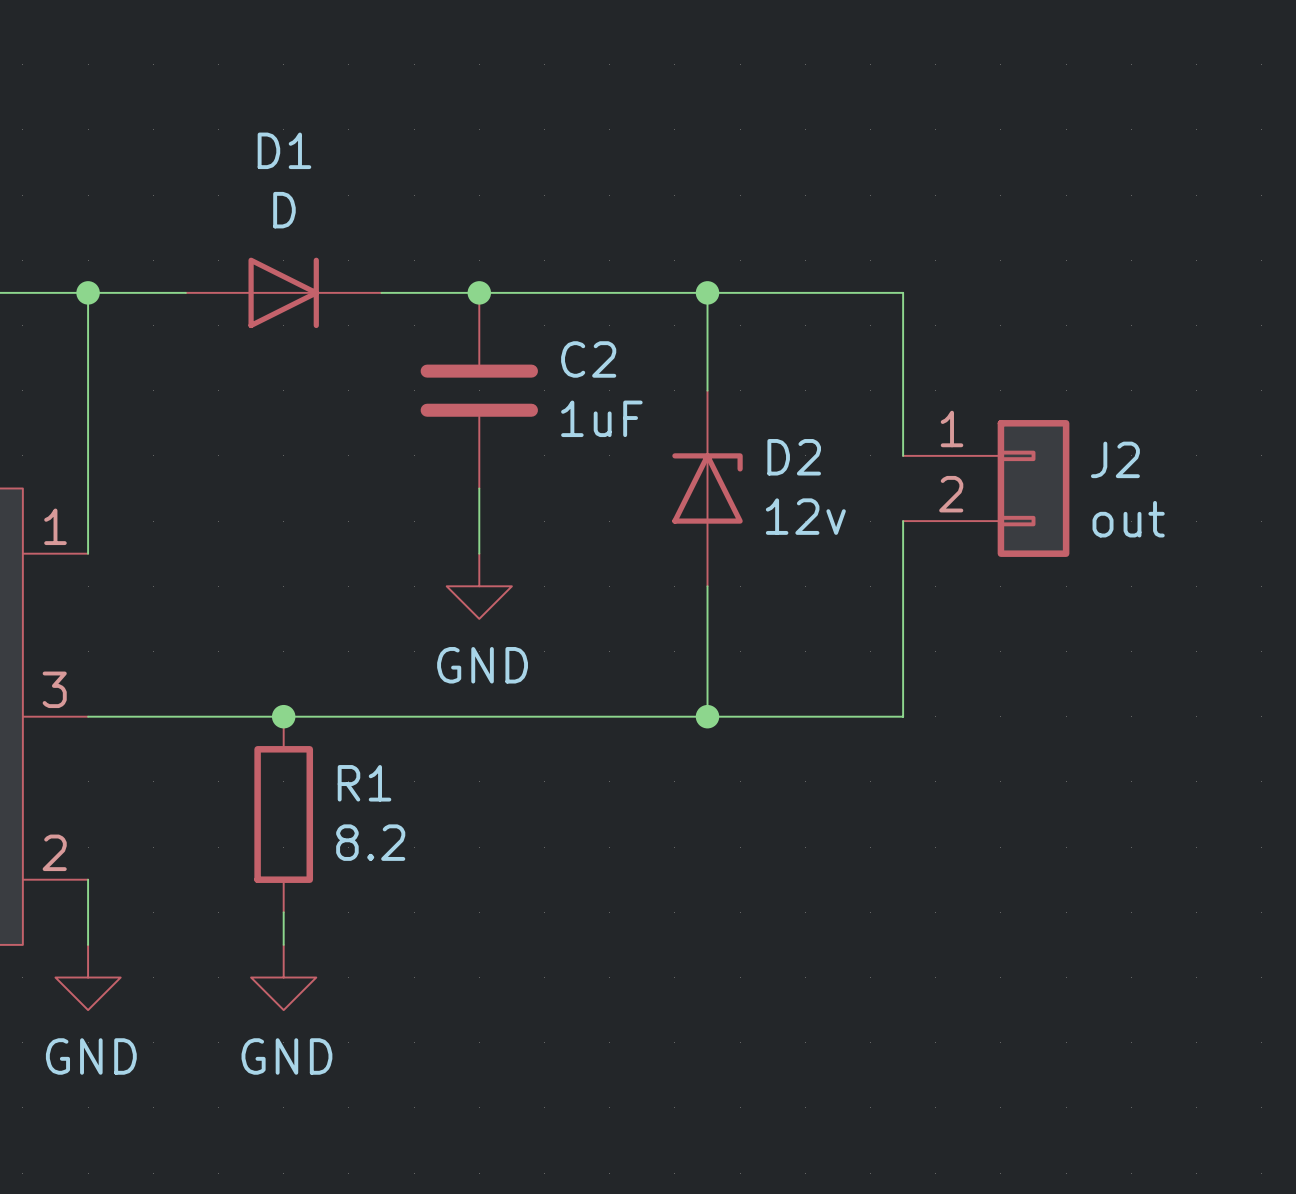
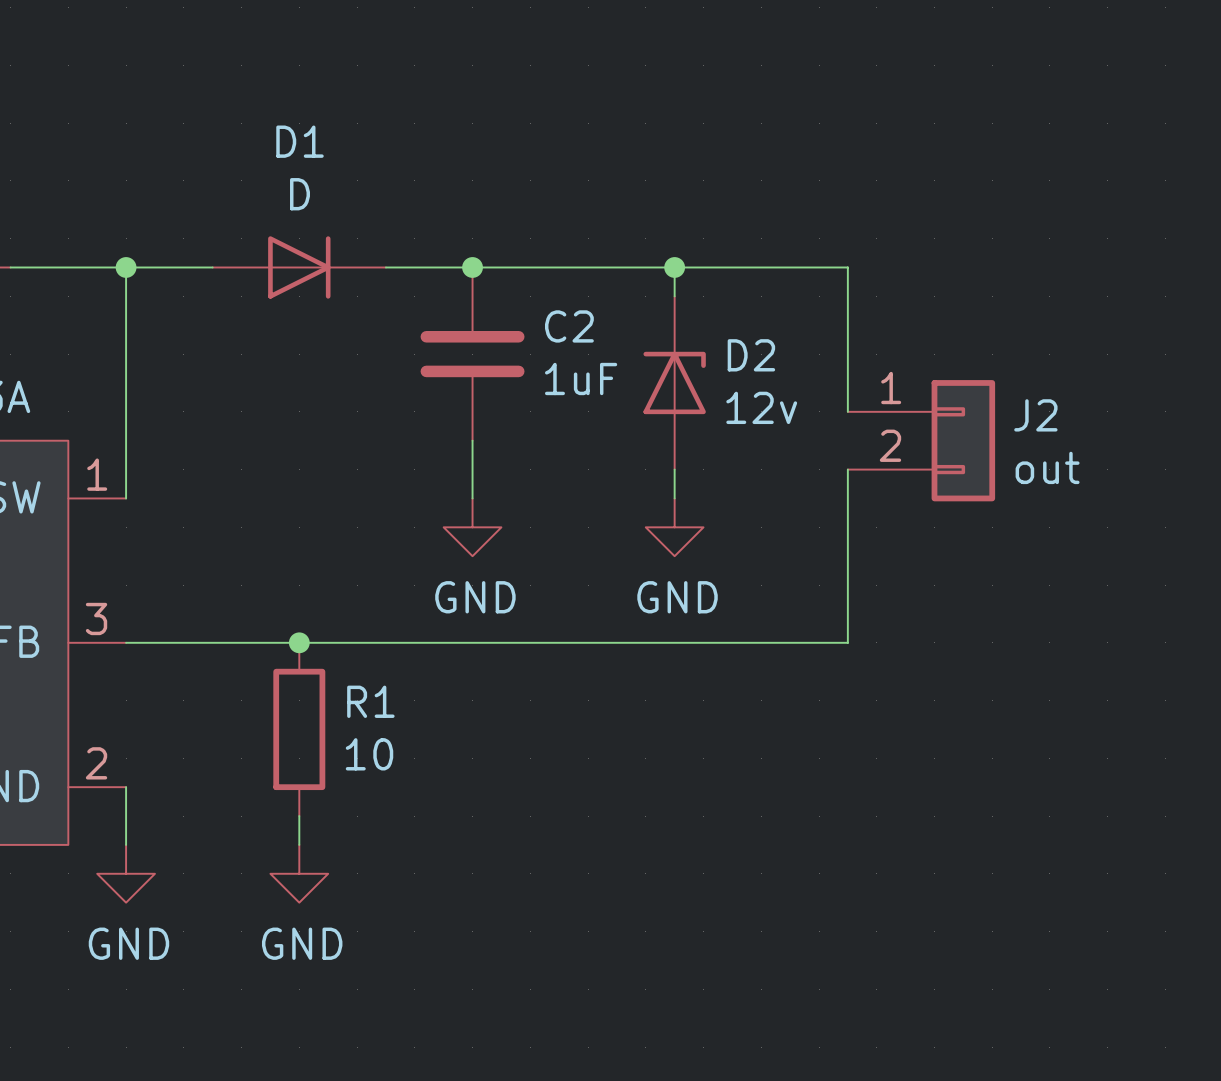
D2 position: (707, 488) -> (674, 382)
wire: (707, 586) (707, 716) -> none
power symbol: none -> GND (674, 527)
junction: (707, 716) -> none
R1 value: 8.2 (370, 842) -> 10 (369, 754)

